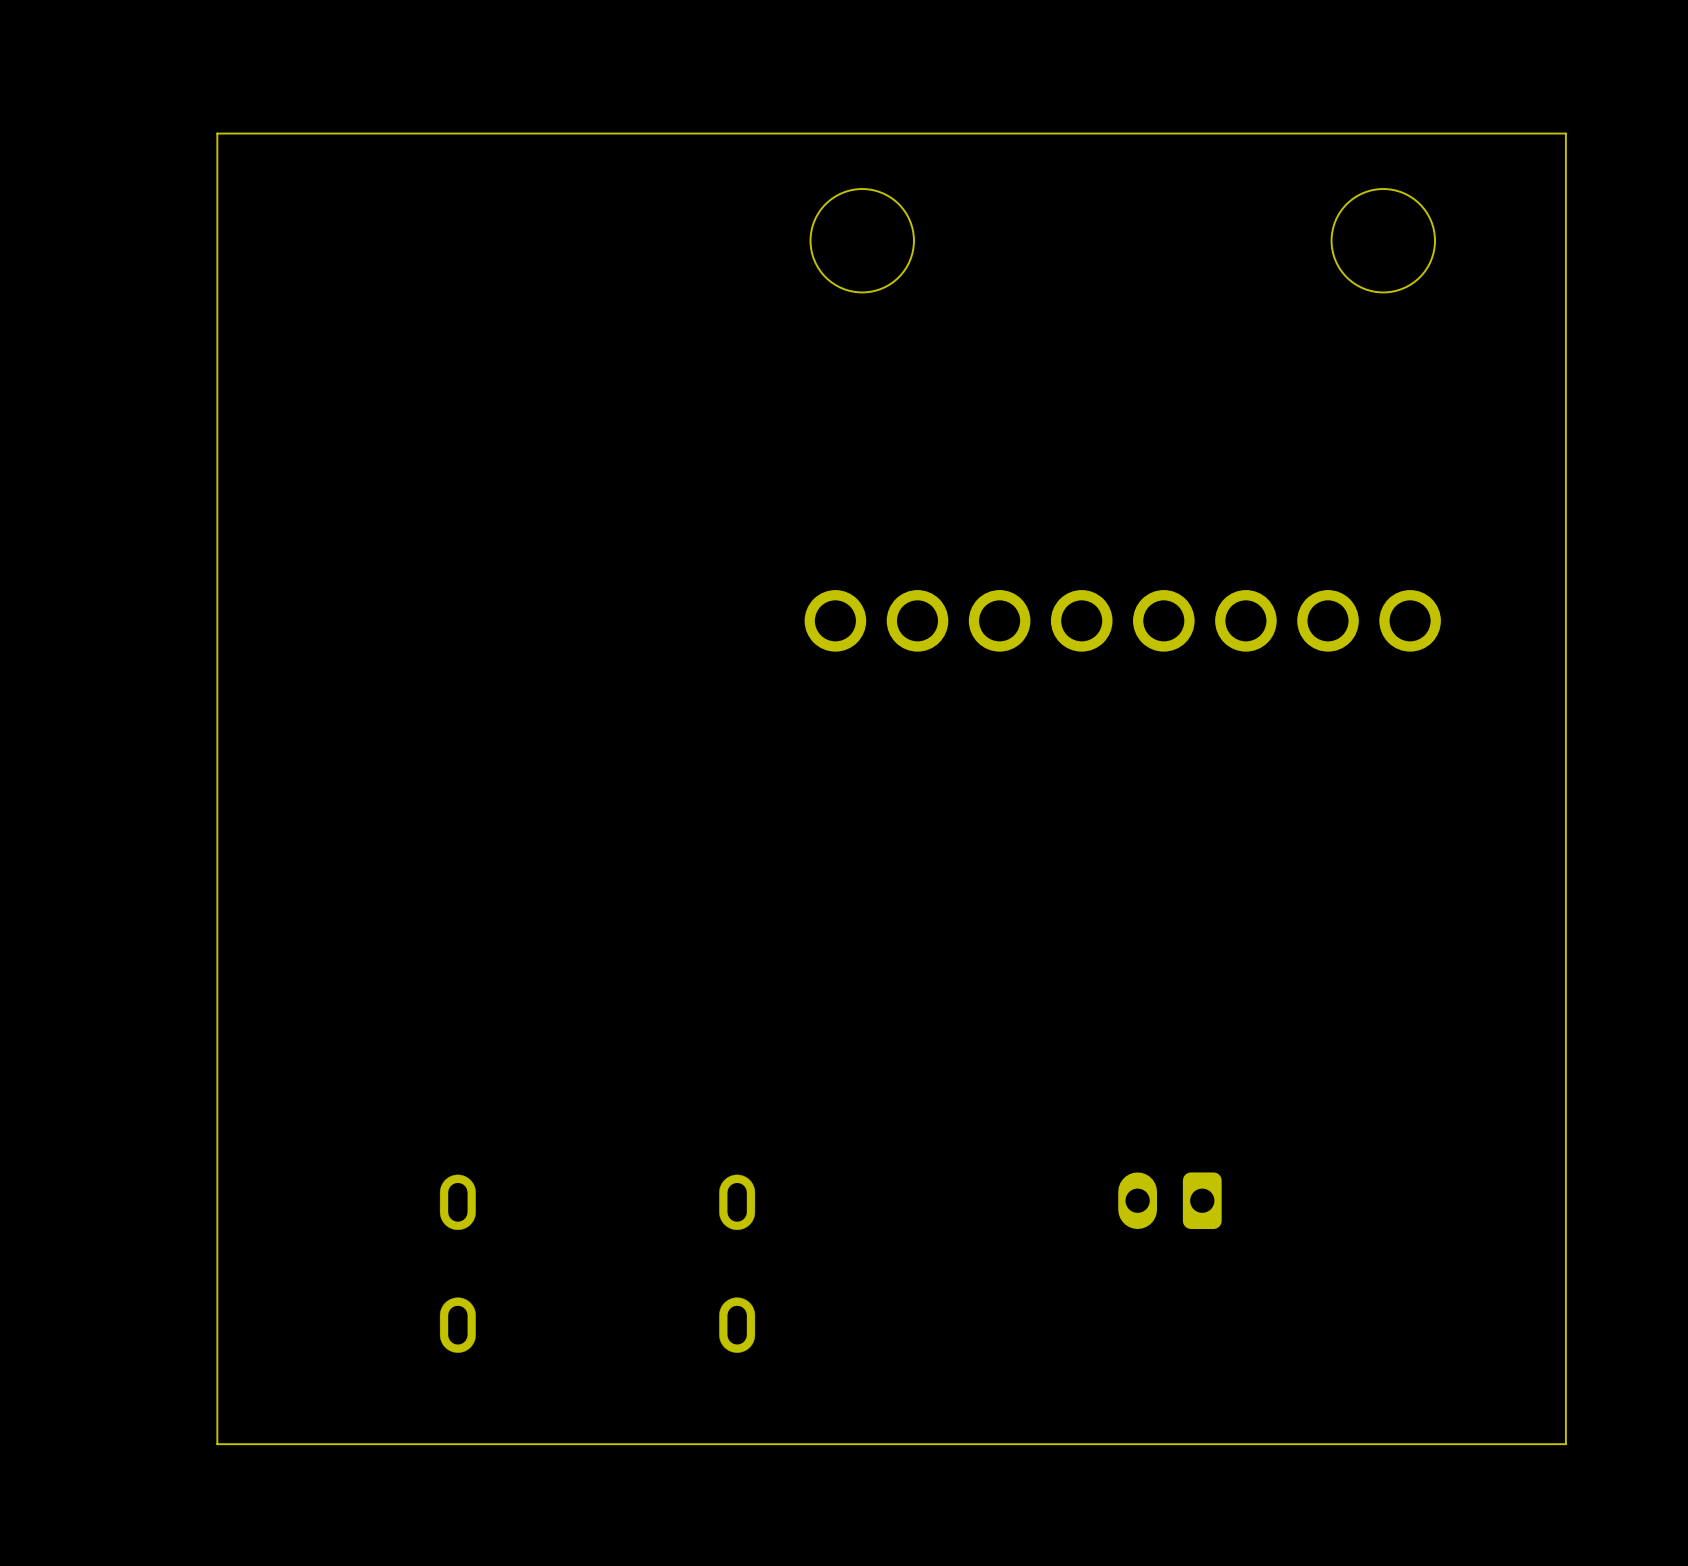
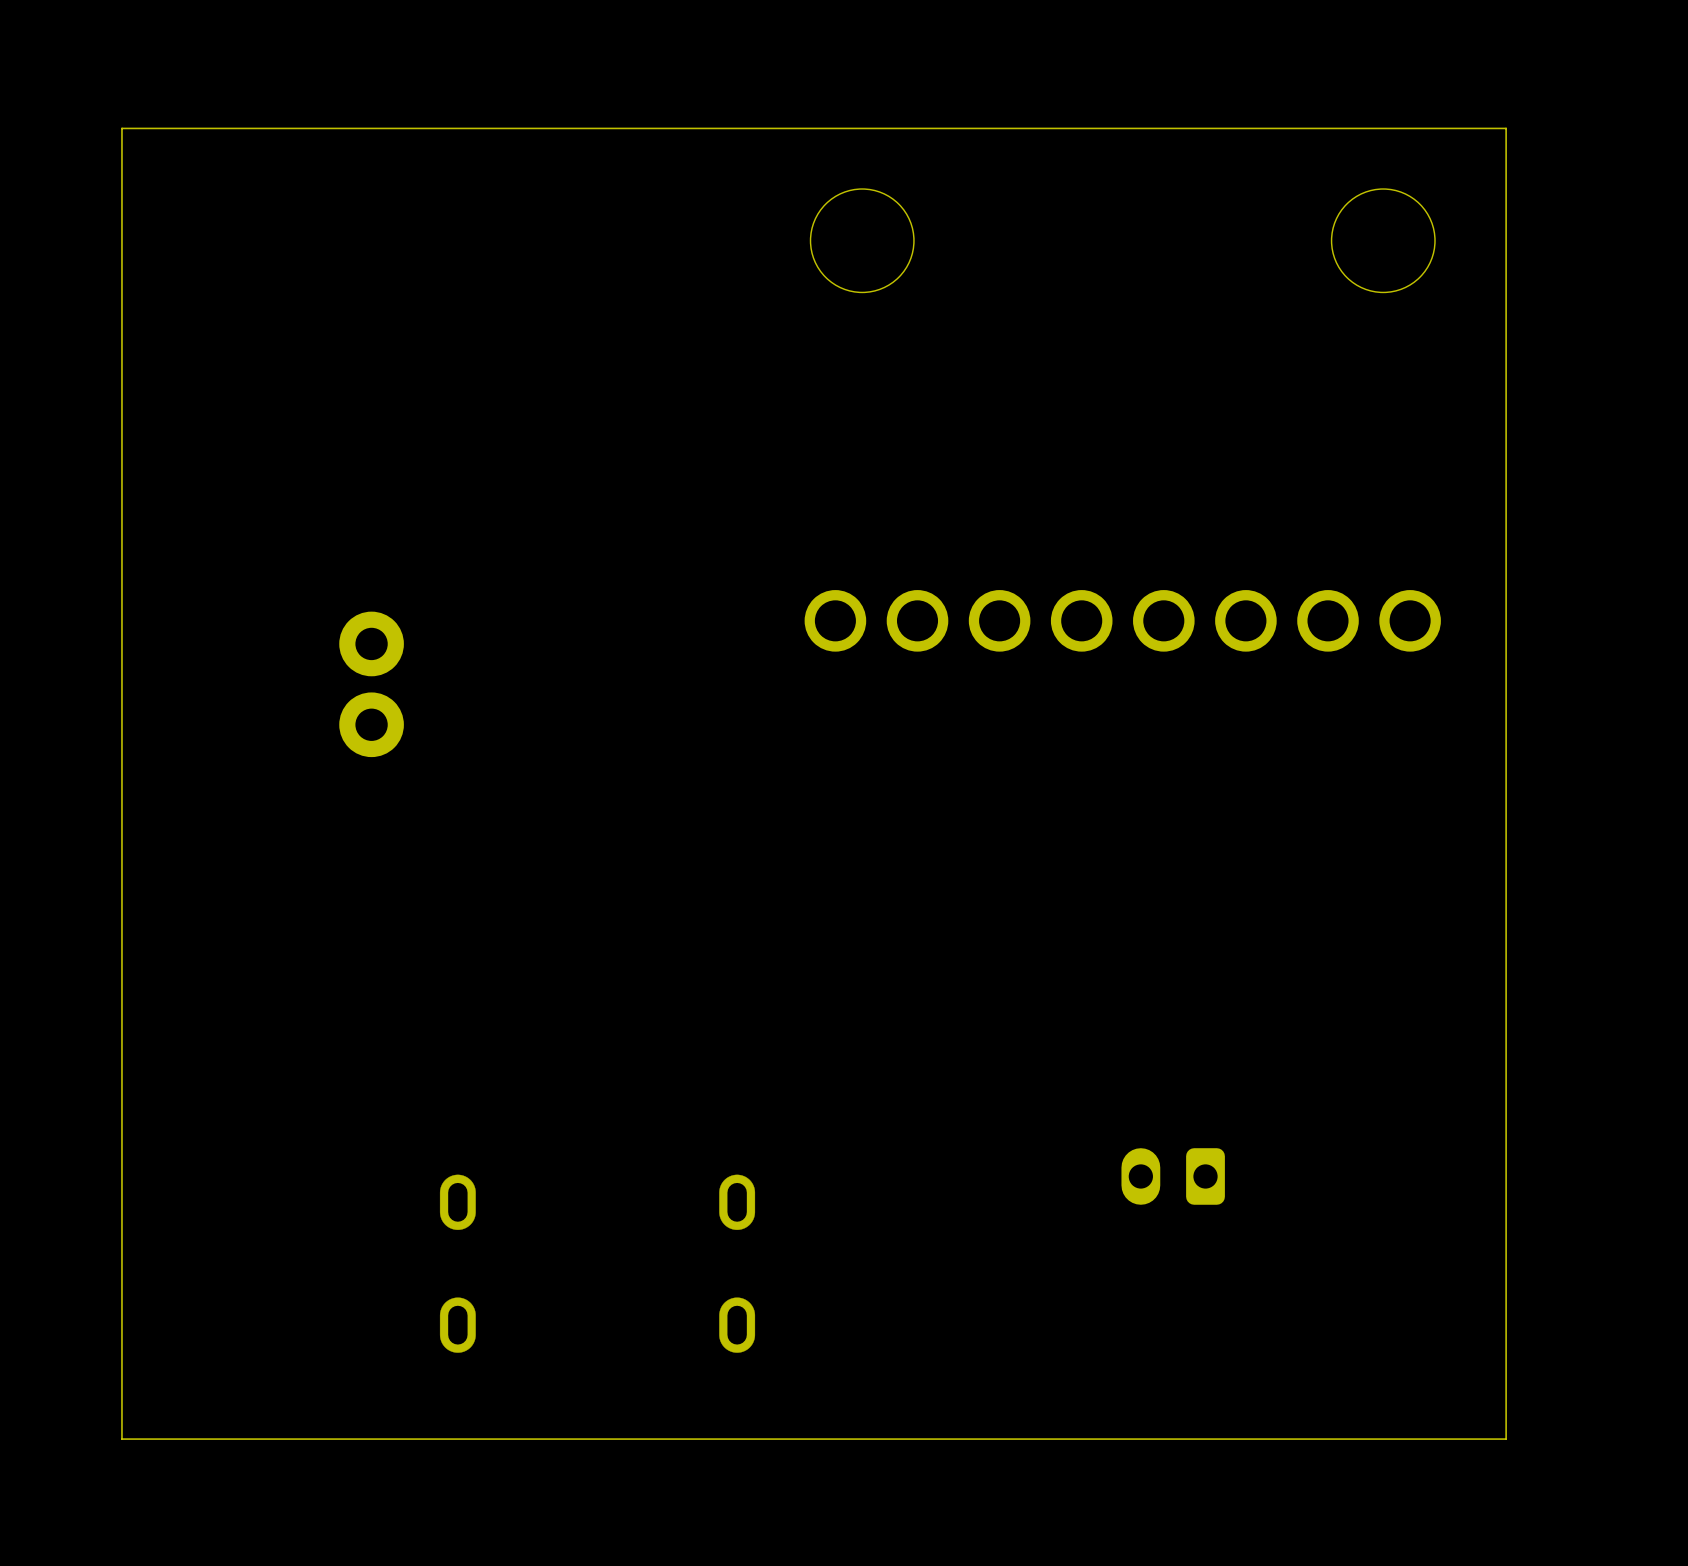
board edge: (1565, 133) (217, 133) (217, 1444) (1565, 1444) (1565, 133) -> (1506, 128) (1506, 1439) (121, 1439) (121, 128) (1506, 128)
part: none -> (371, 684)
part position: (1169, 1200) -> (1173, 1176)

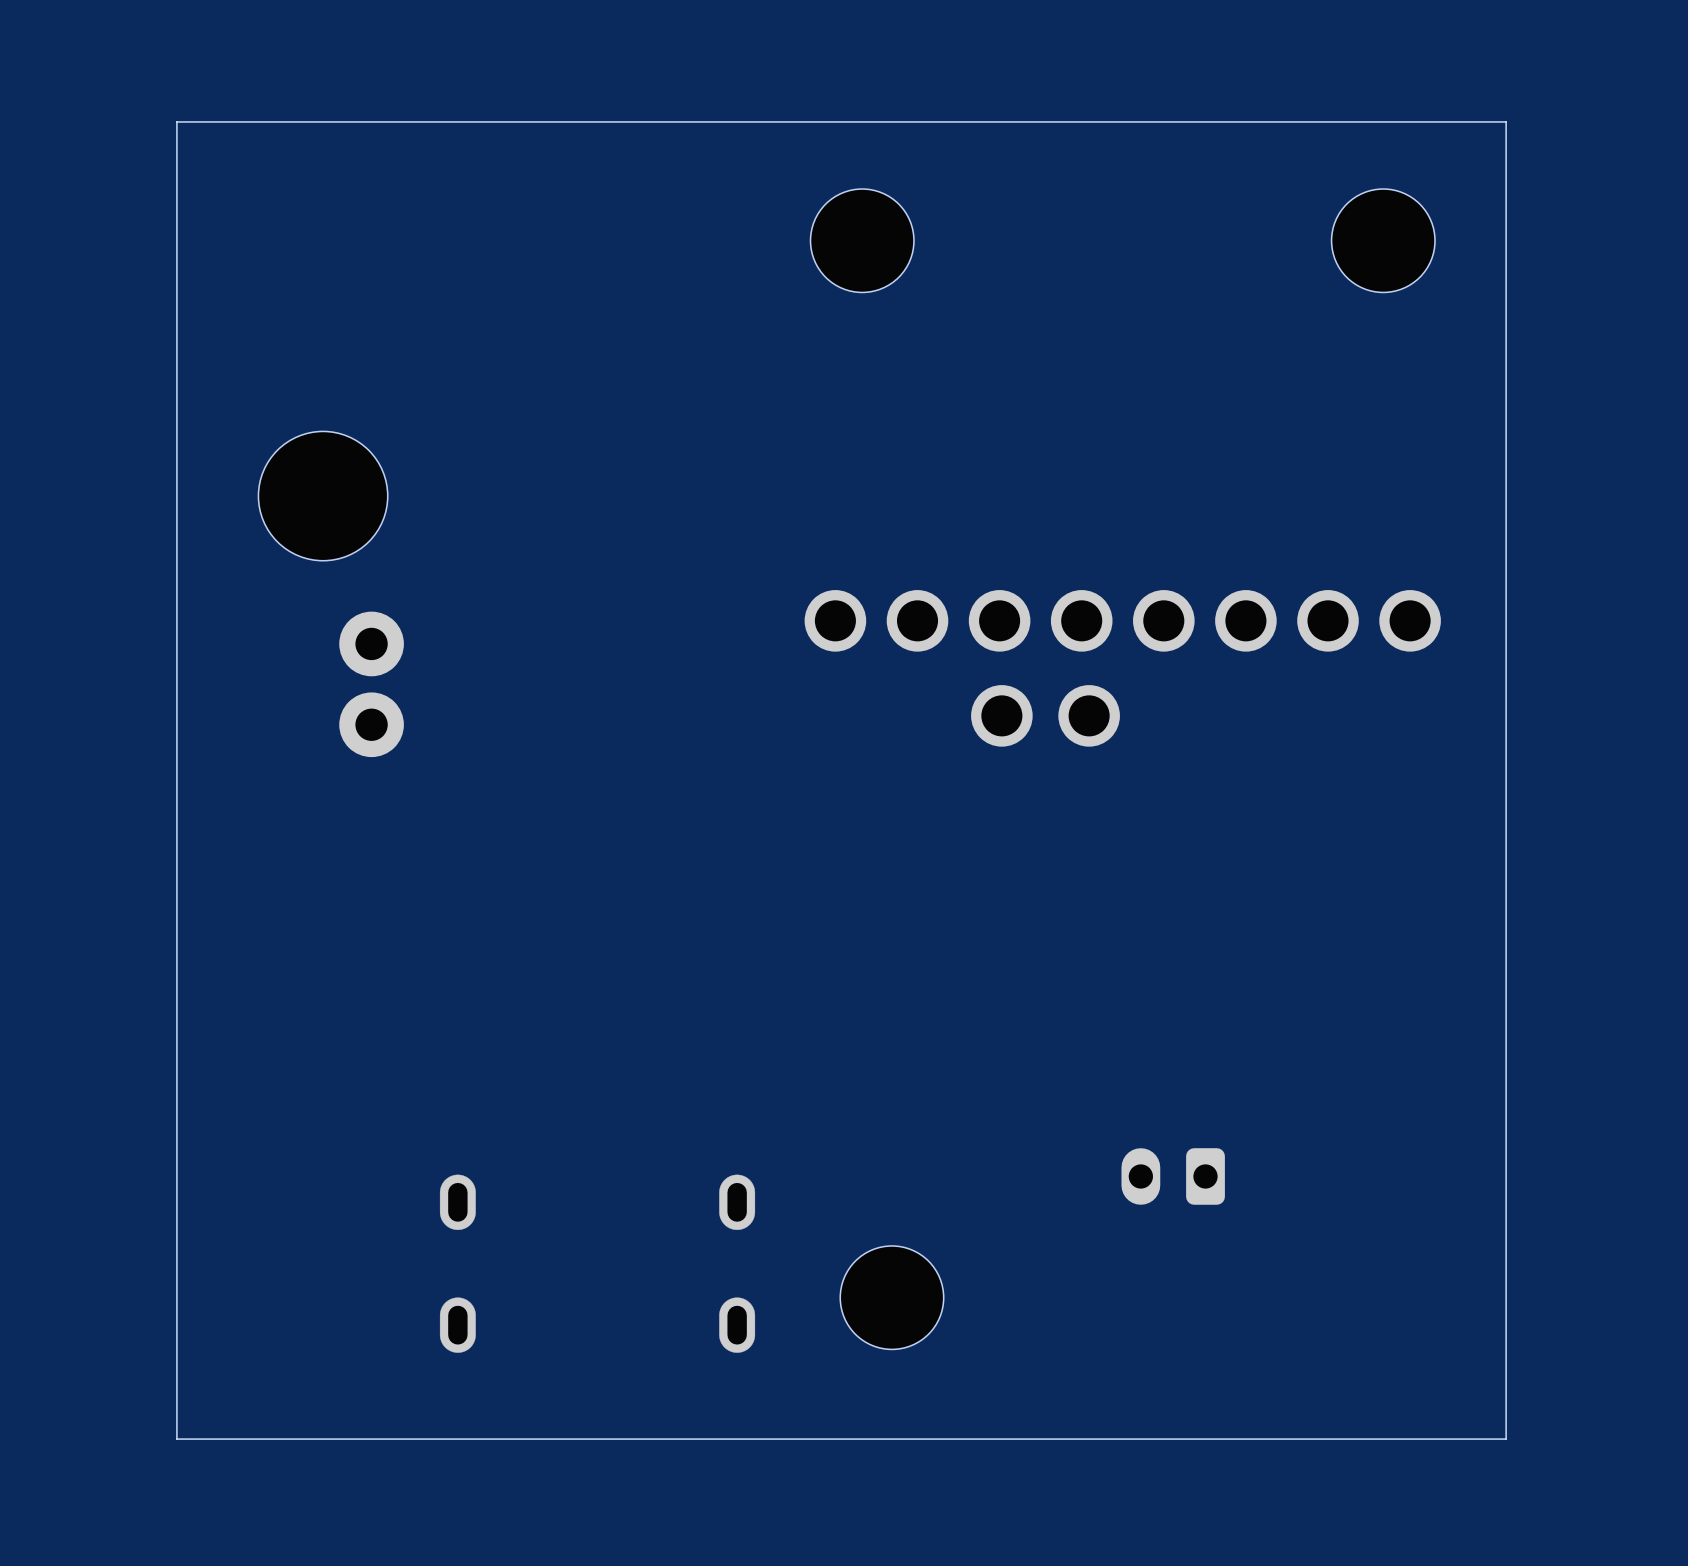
board edge: (1506, 128) (121, 128) (121, 1439) (176, 1439) -> (1506, 128) (1506, 121) (176, 121) (176, 1439)
part: none -> (323, 496)
part: none -> (1001, 715)
part: none -> (1089, 715)
part: none -> (891, 1297)

